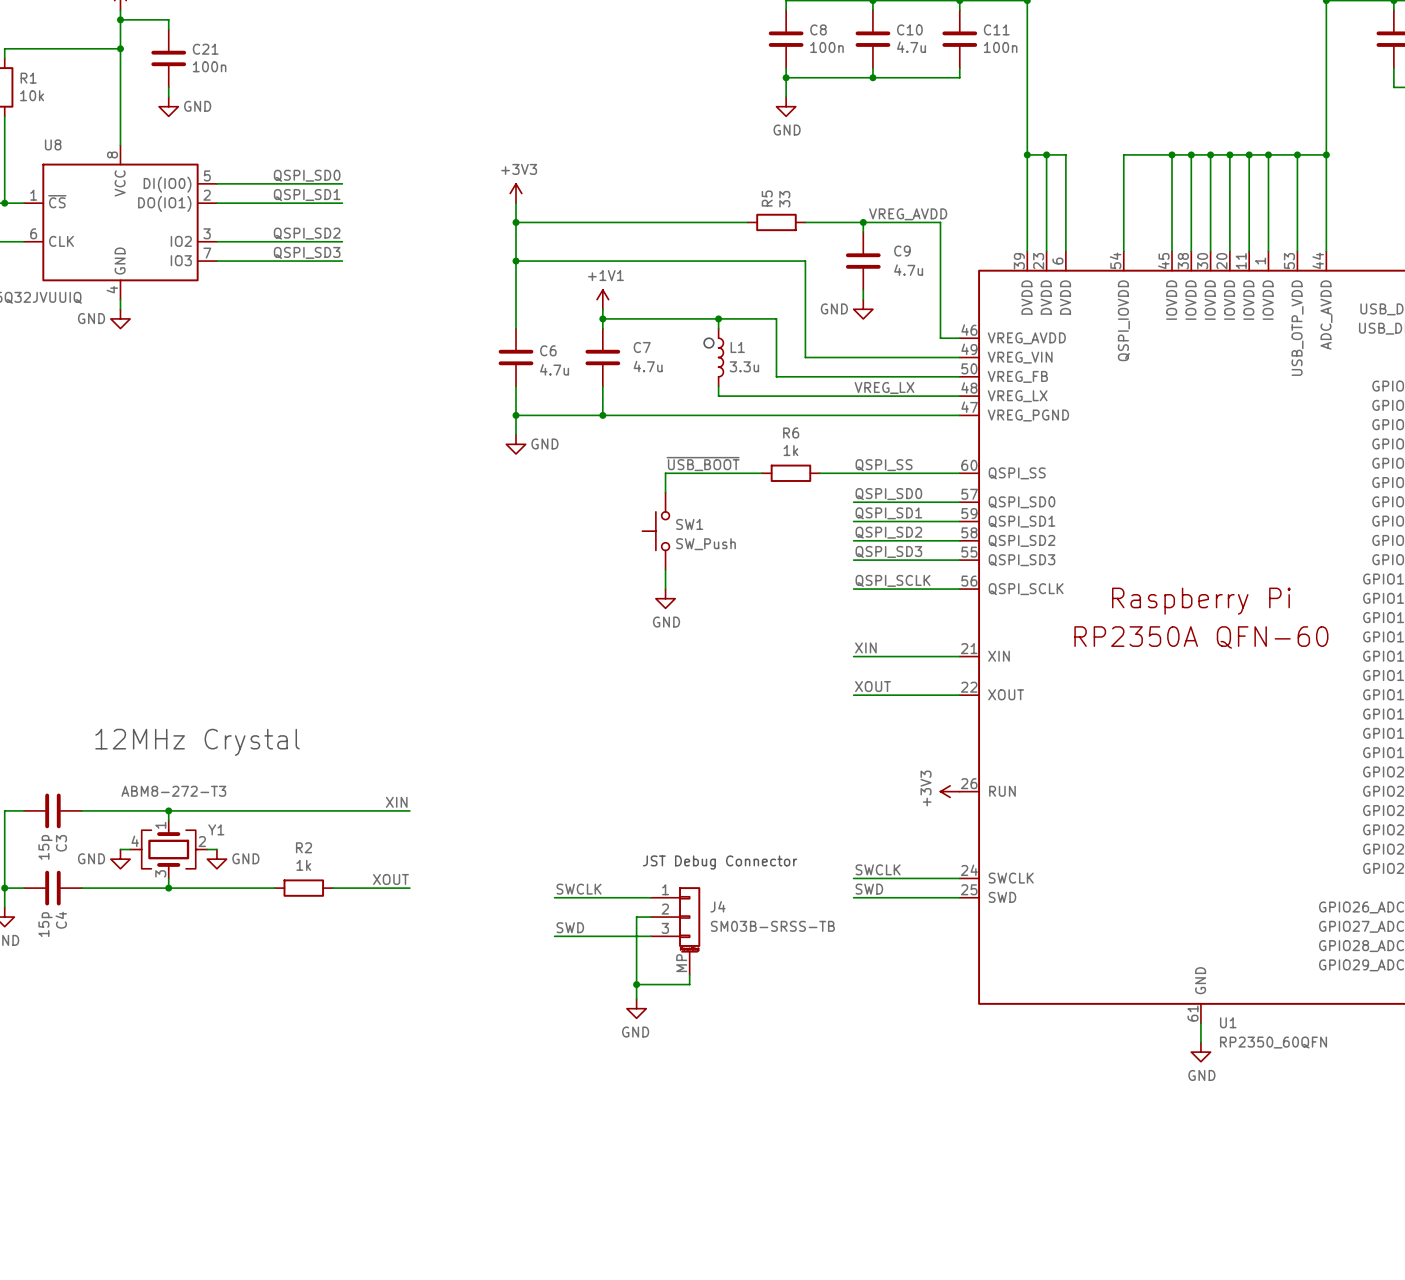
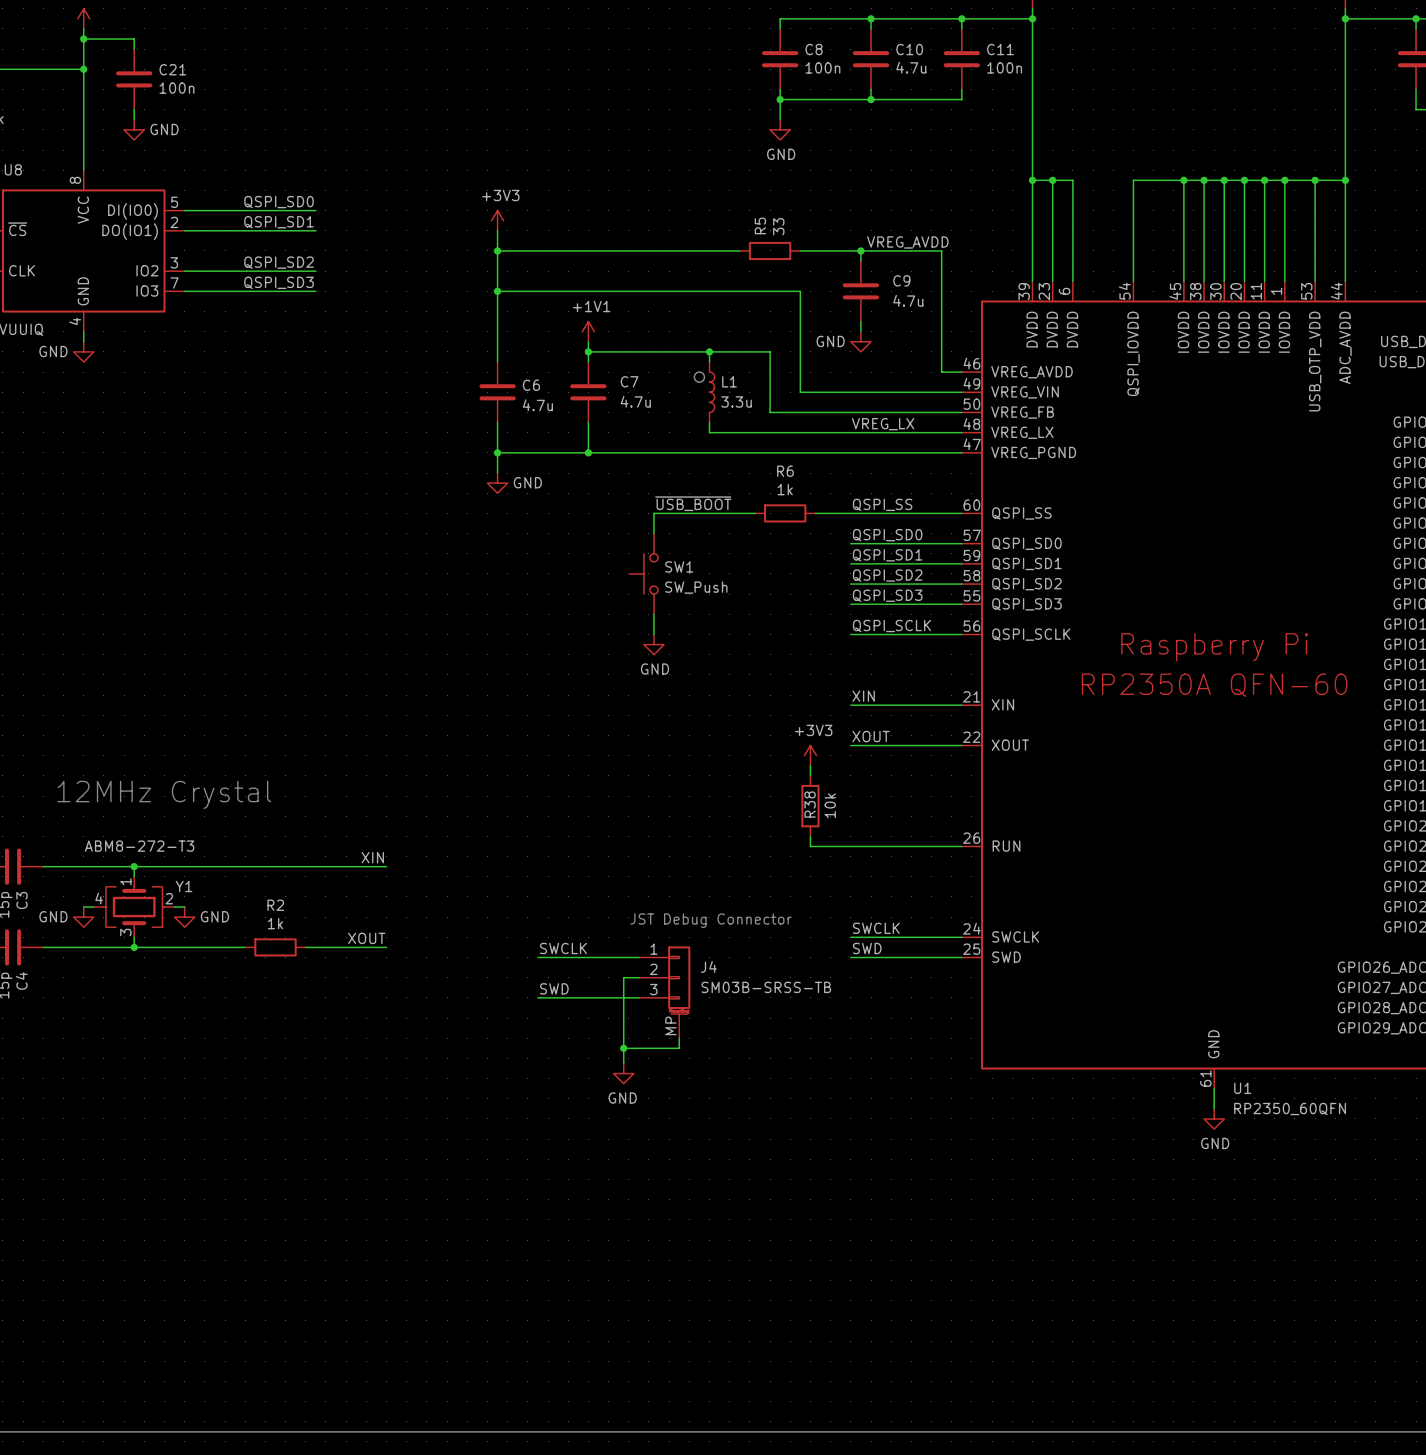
wire: none -> (810, 765) (810, 775)
R38: none -> 10k (810, 806)
wire: none -> (810, 836) (810, 846) (961, 846)
power symbol rotation: 0° (950, 791) -> 90° clockwise (810, 755)
power symbol position: +3V3 (950, 791) -> +3V3 (810, 755)

